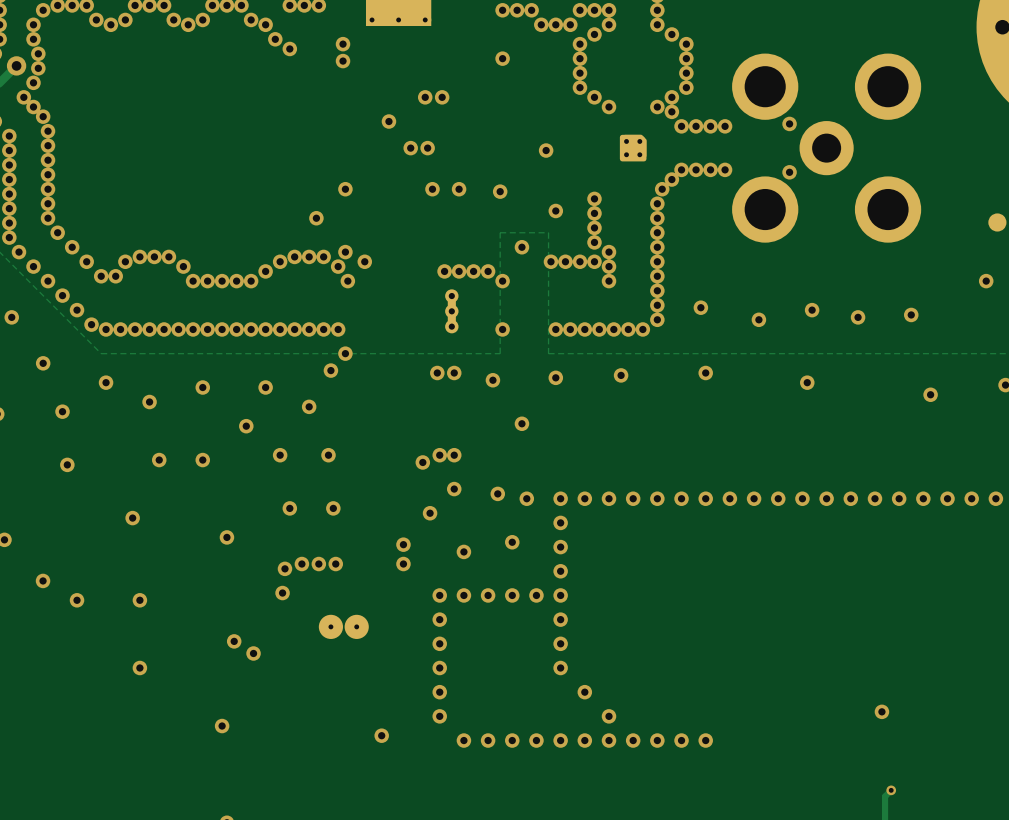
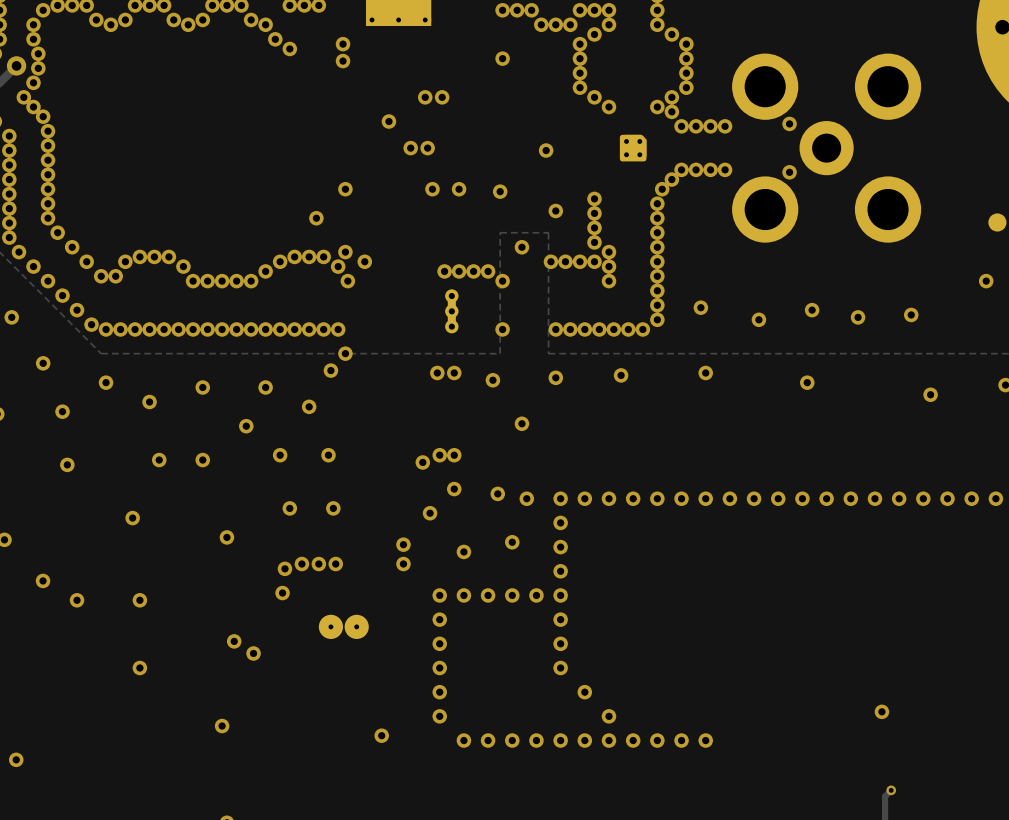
via: none -> (16, 759)

